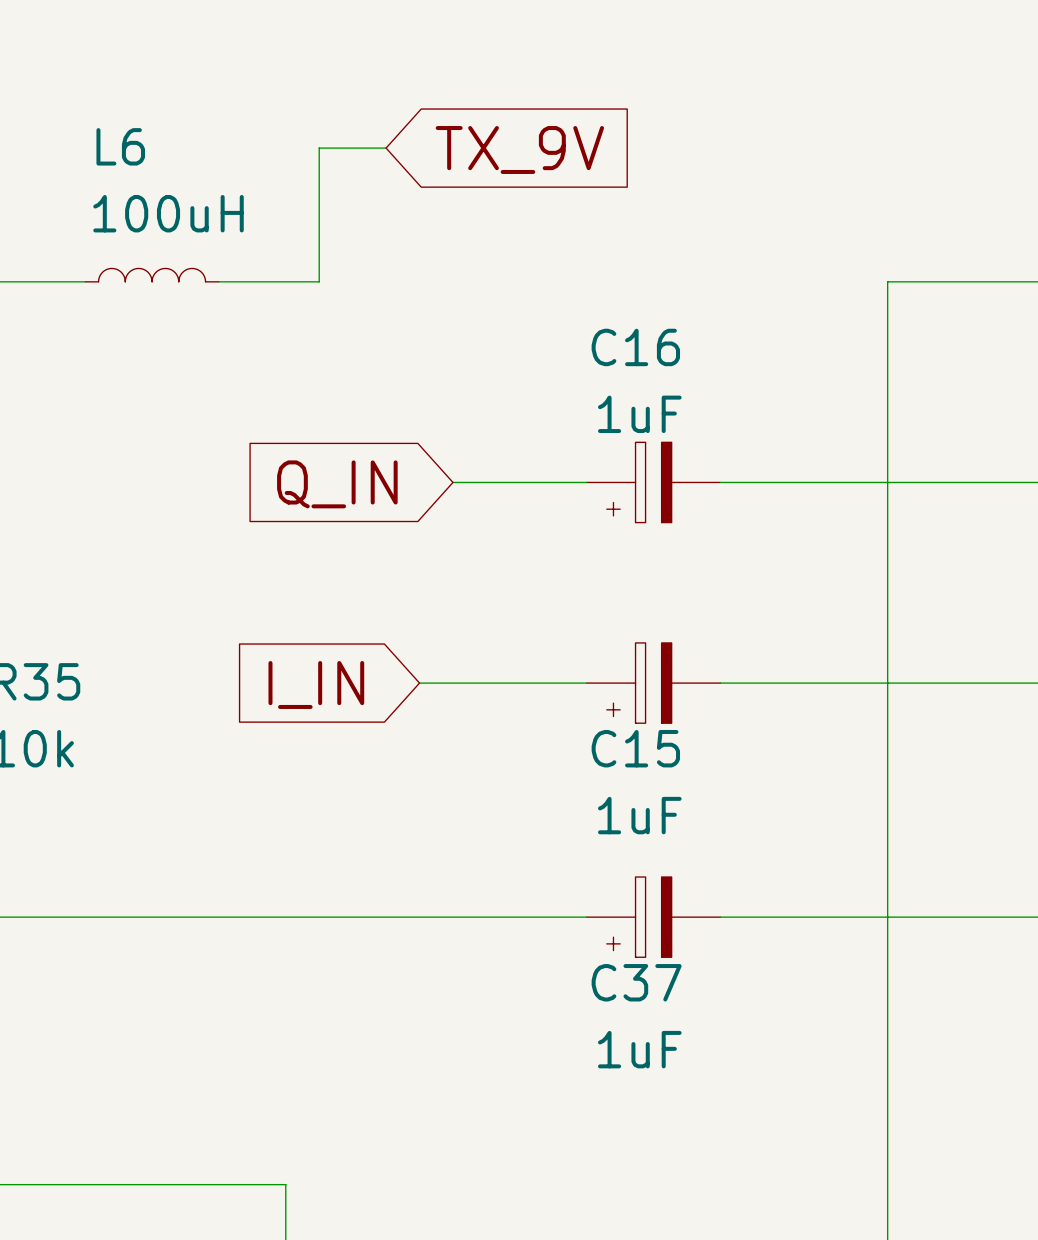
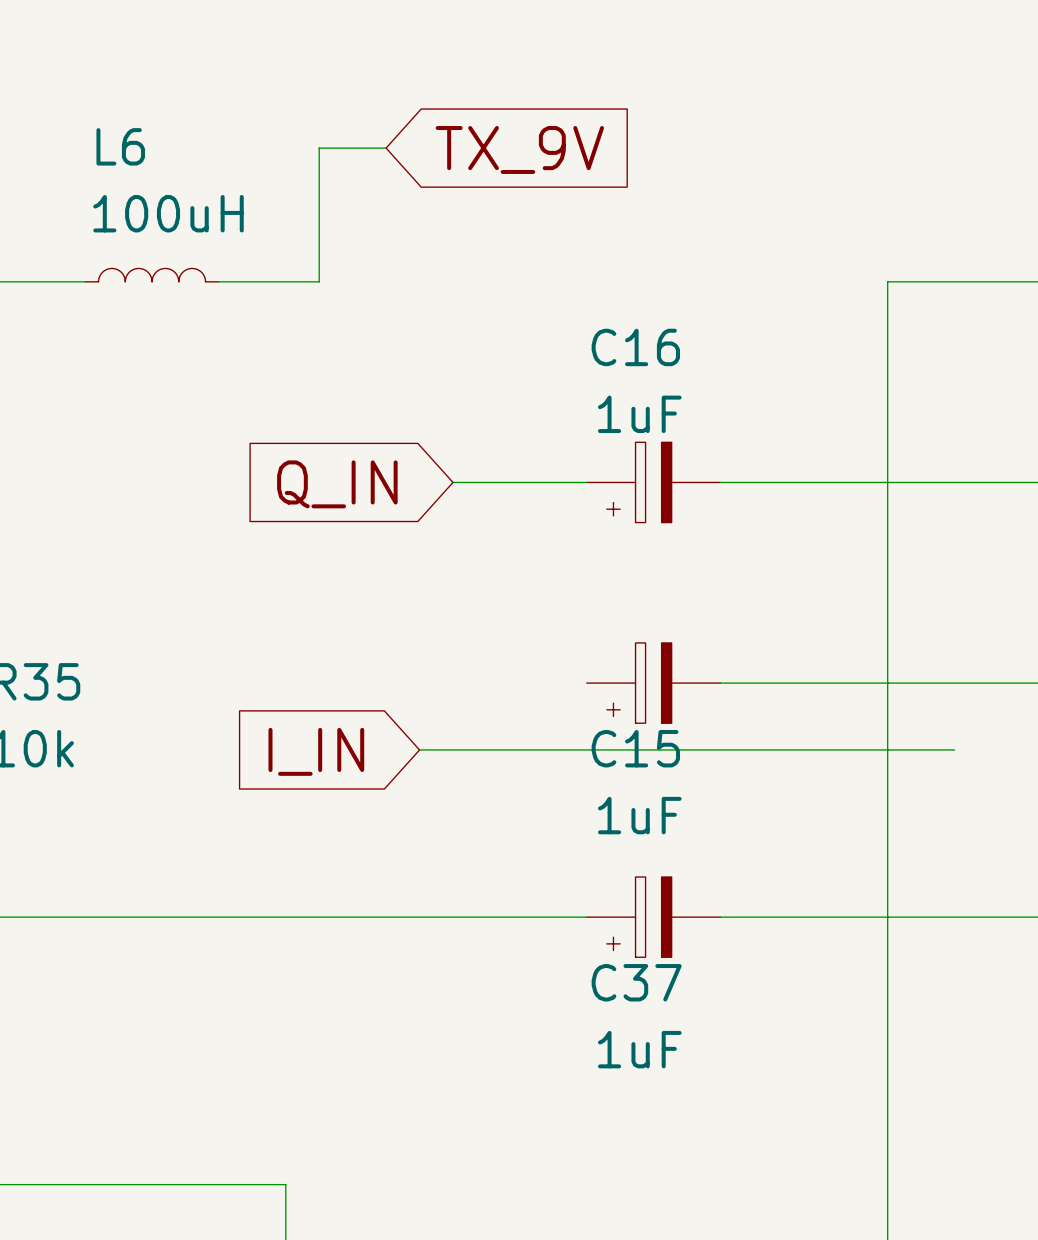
wire: (419, 683) (586, 683) -> none
global label position: I_IN (316, 684) -> I_IN (316, 751)
wire: none -> (419, 749) (954, 749)

